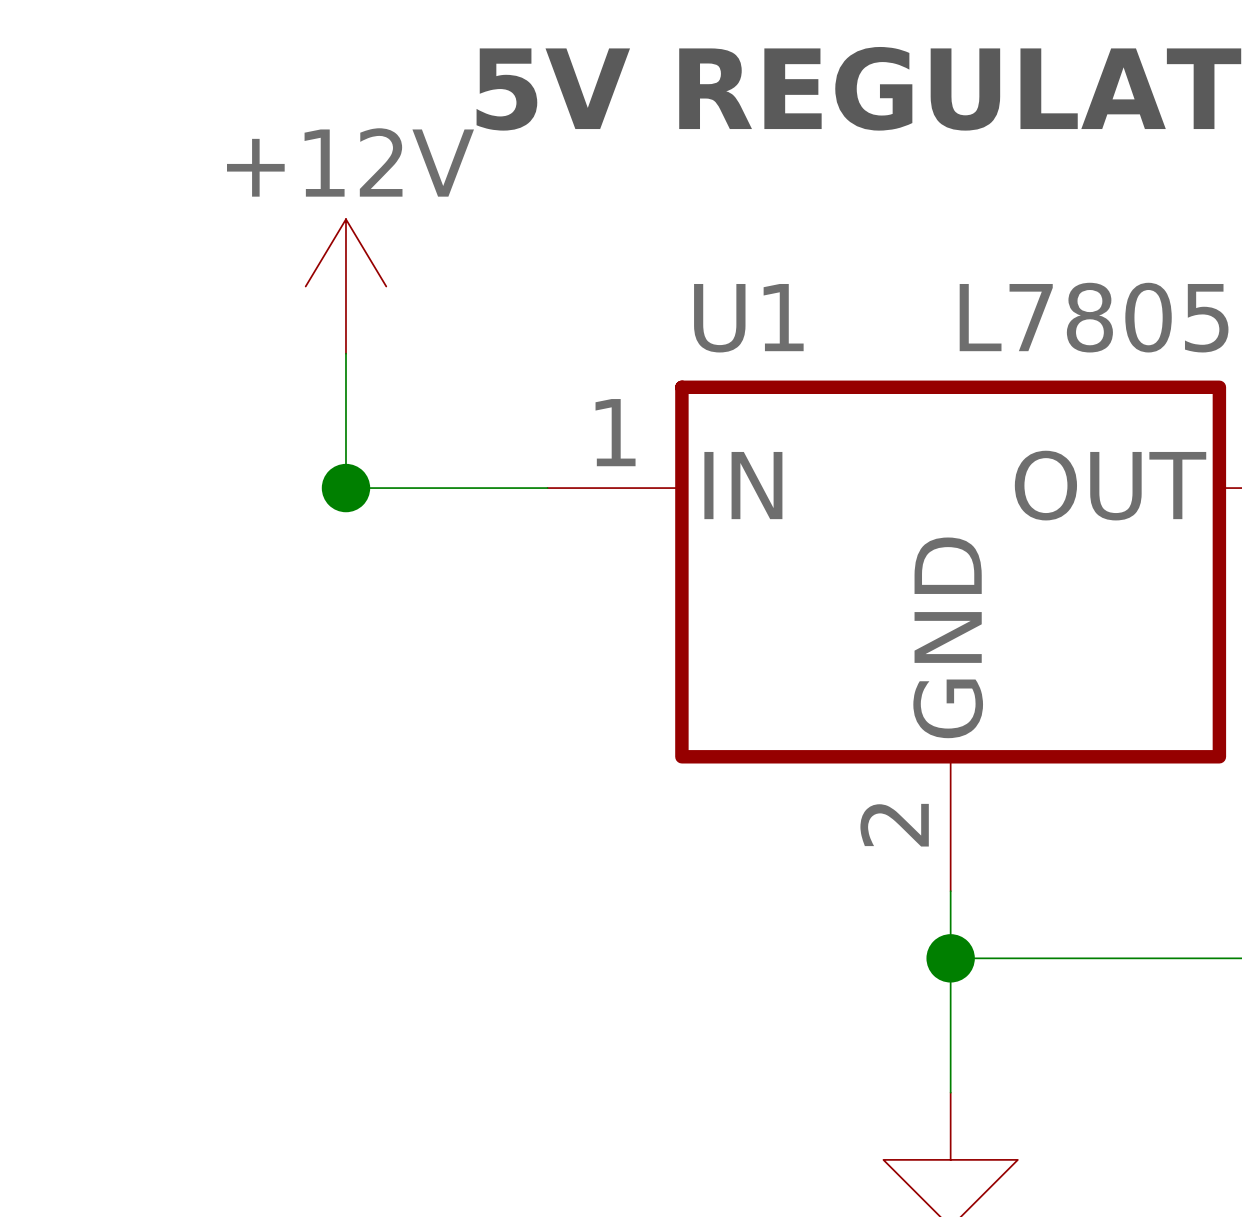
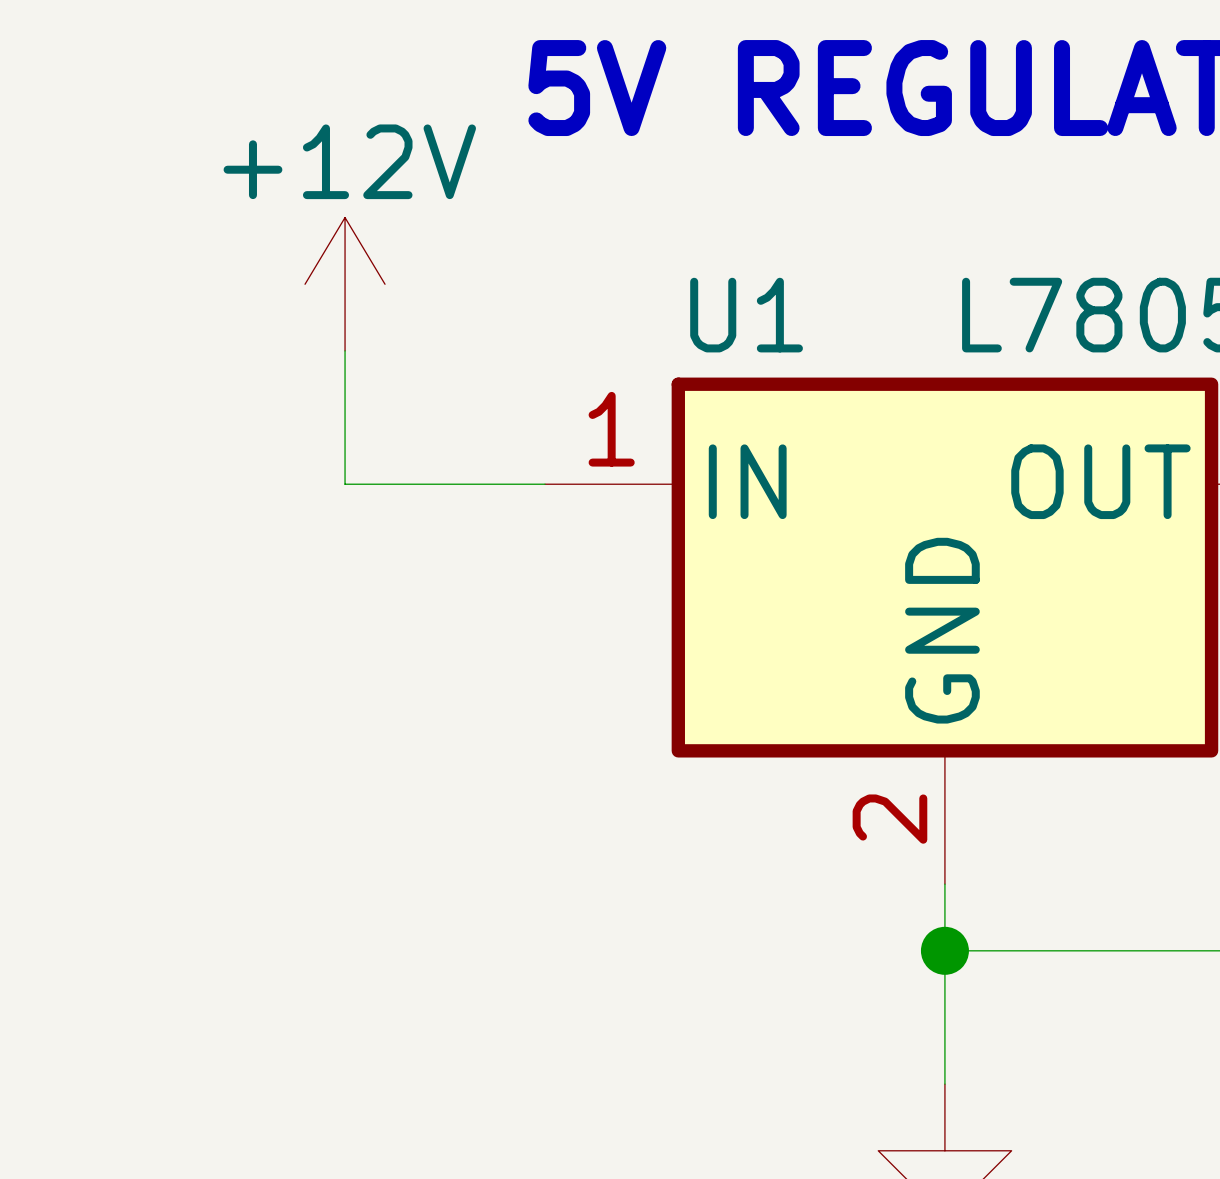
junction: (345, 488) -> none

